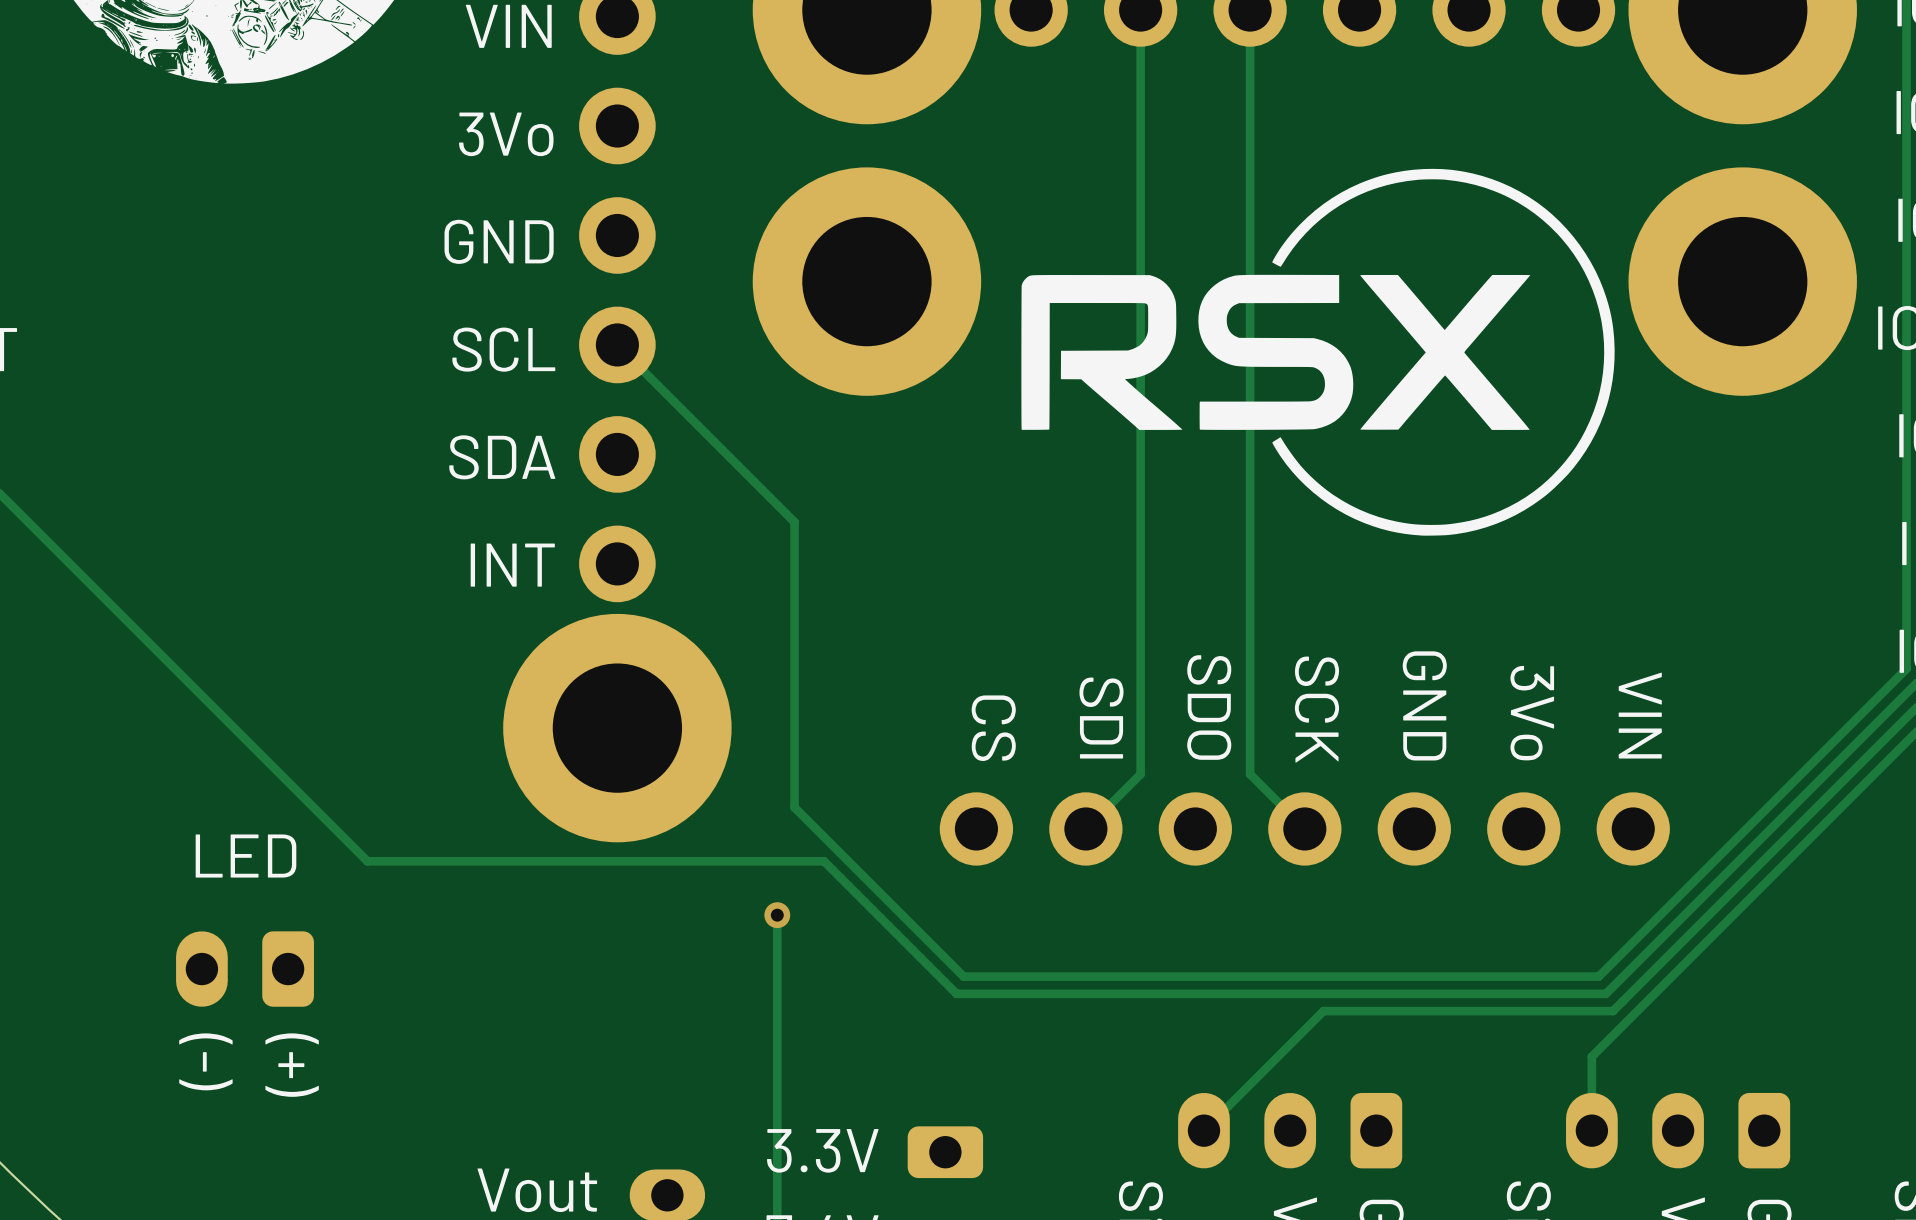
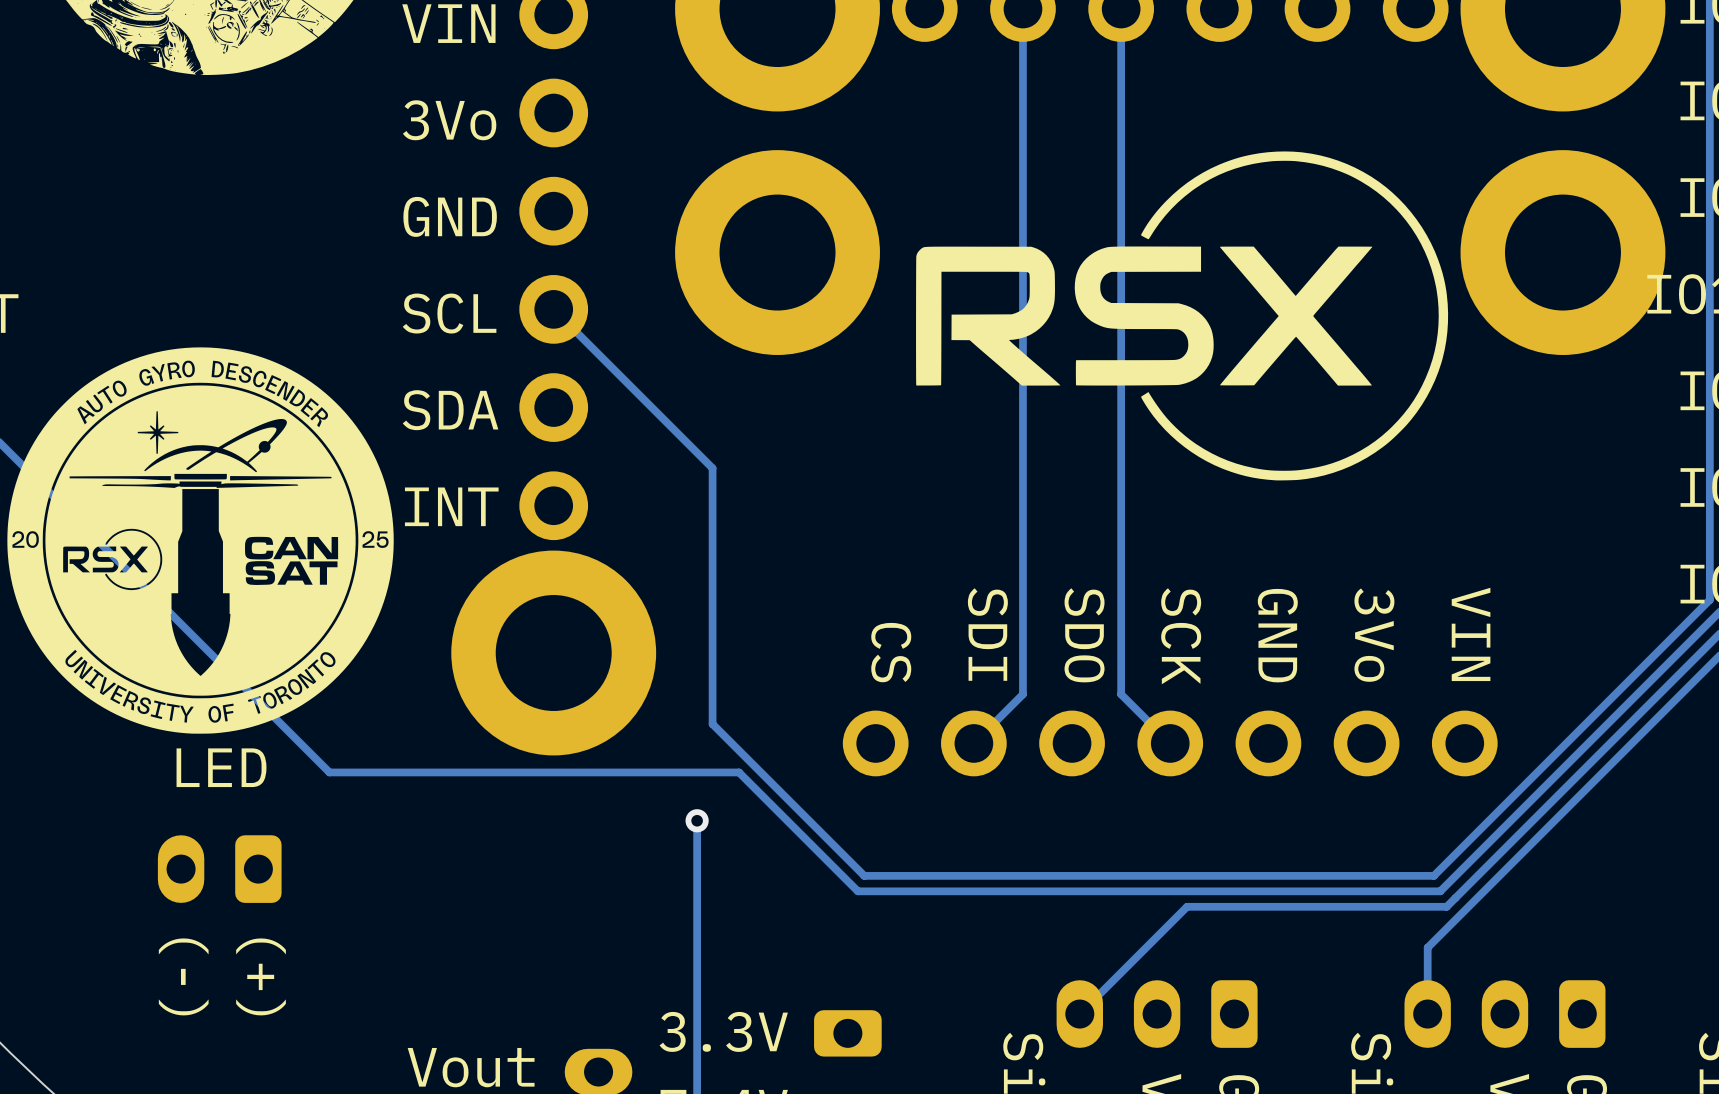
drawing: none -> [7, 347, 394, 734]

